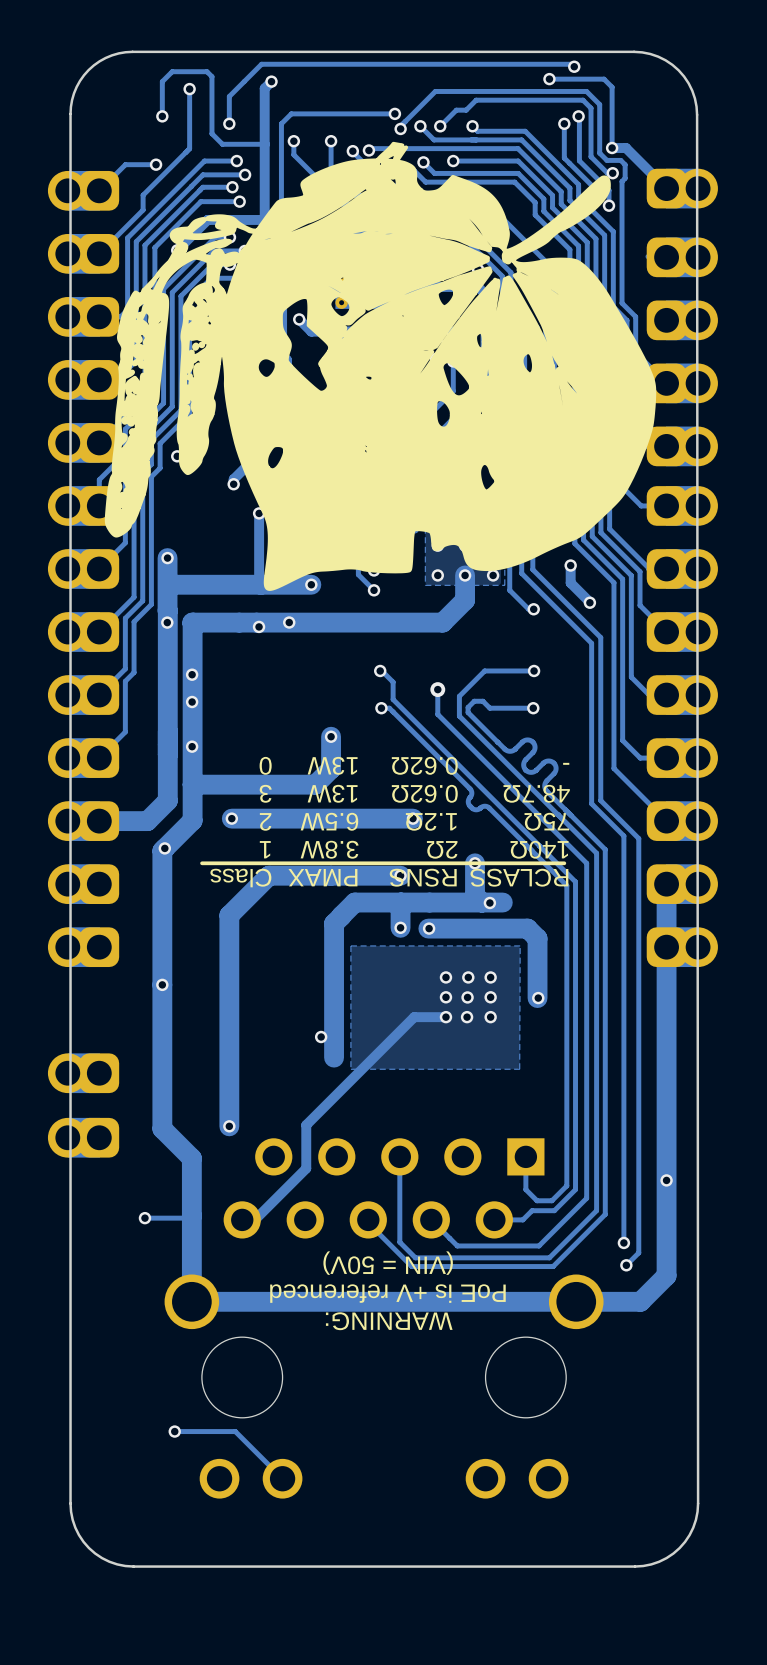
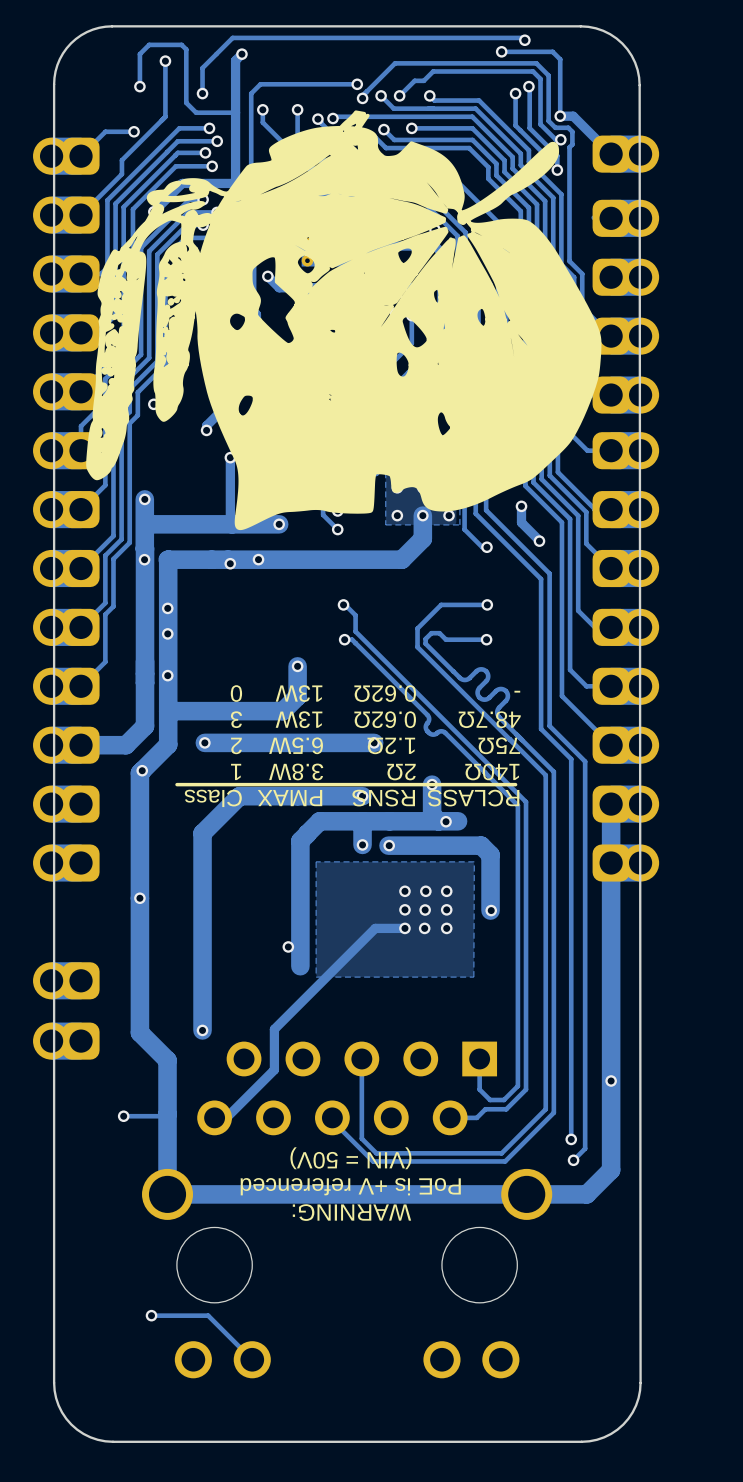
track: (437, 689) (437, 714) (586, 863) (586, 1198) (539, 1245) (457, 1245) (431, 1219) -> none
via: (437, 689) -> none

